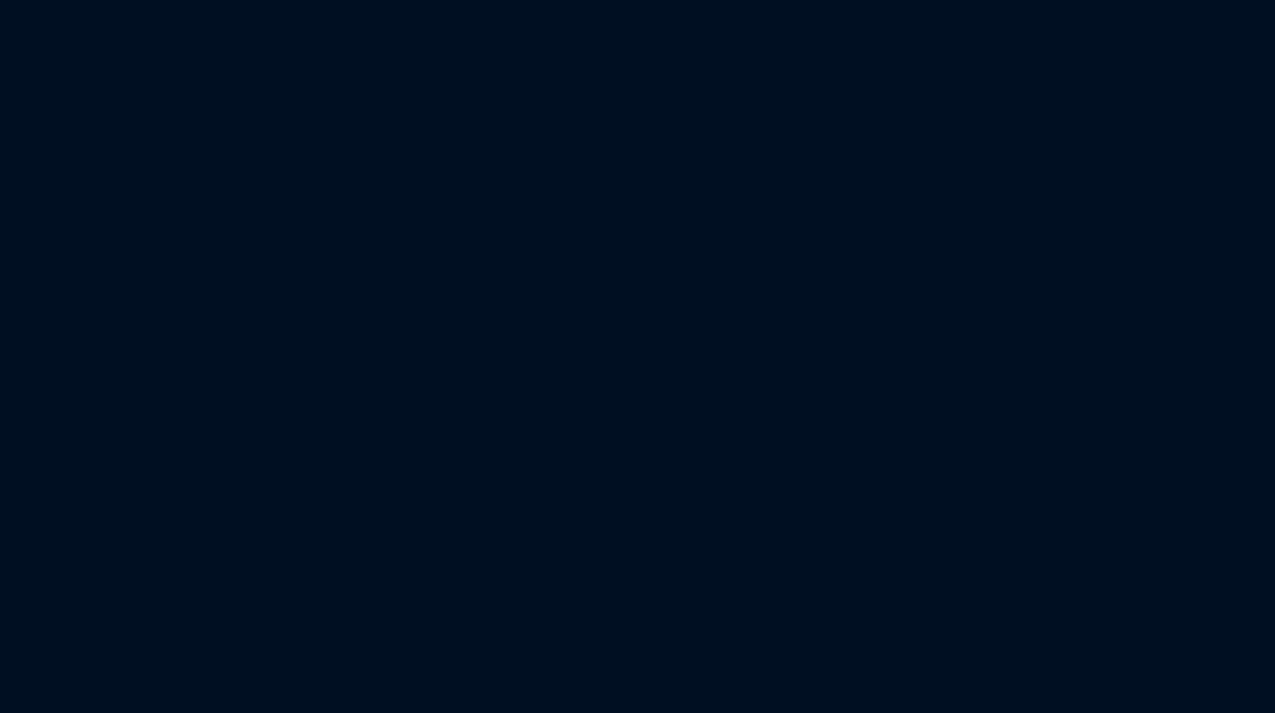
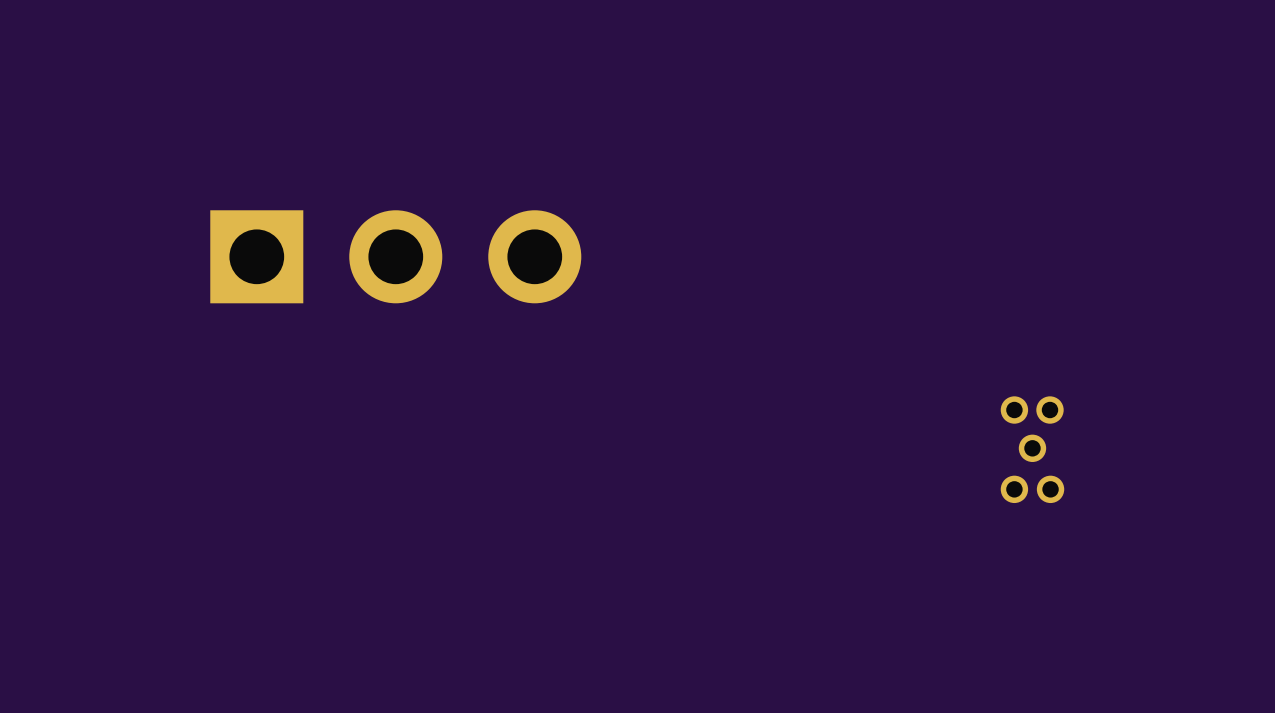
part: none -> (395, 256)
part: none -> (1032, 449)

